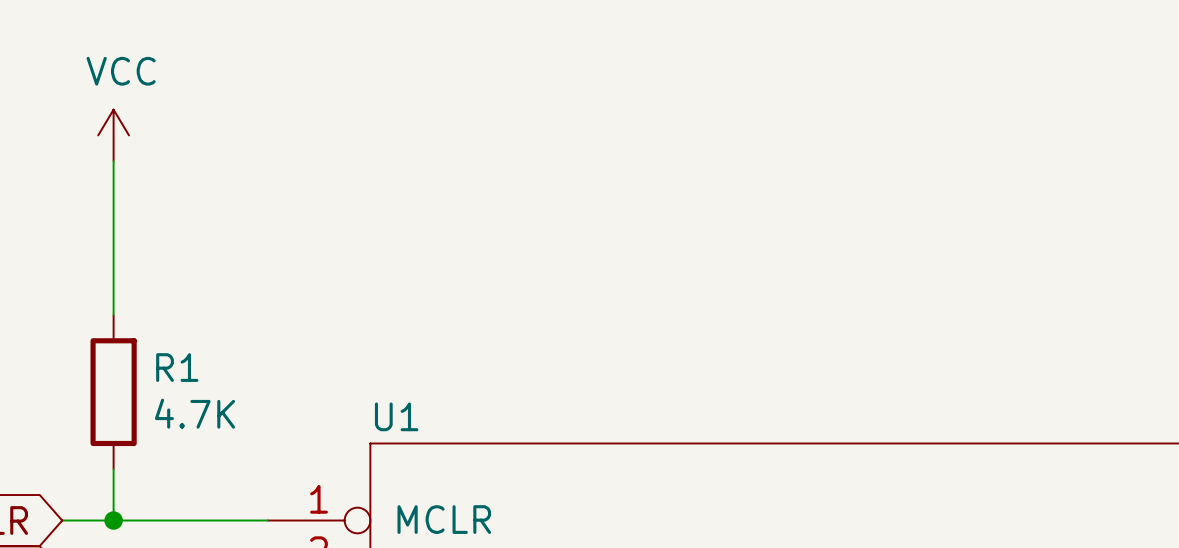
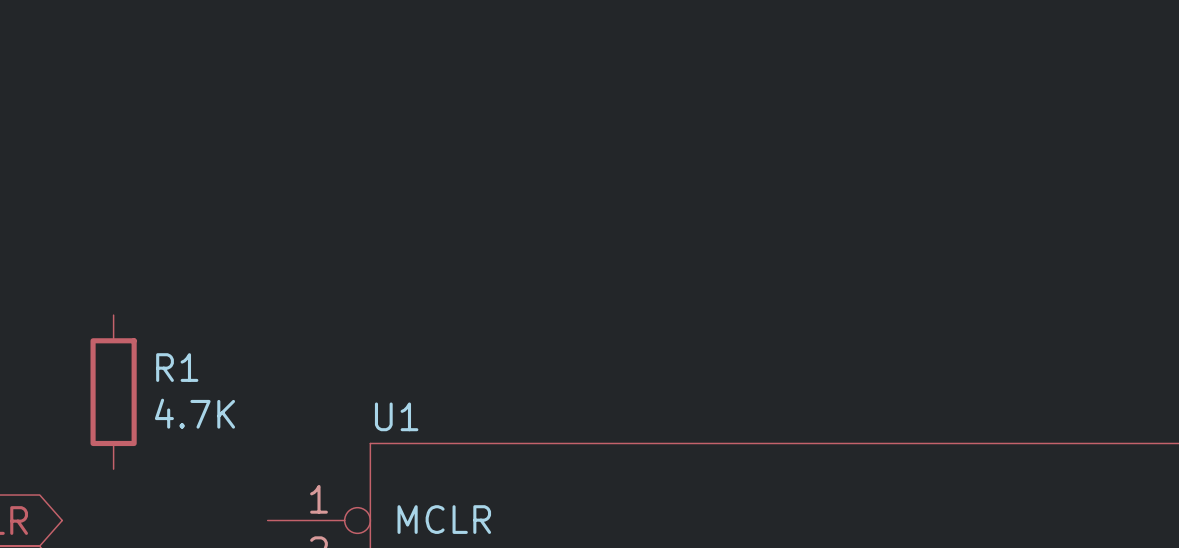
power symbol: VCC (113, 135) -> none
wire: (113, 161) (113, 315) -> none
wire: (113, 469) (113, 520) -> none
wire: (62, 520) (267, 520) -> none
junction: (113, 520) -> none

